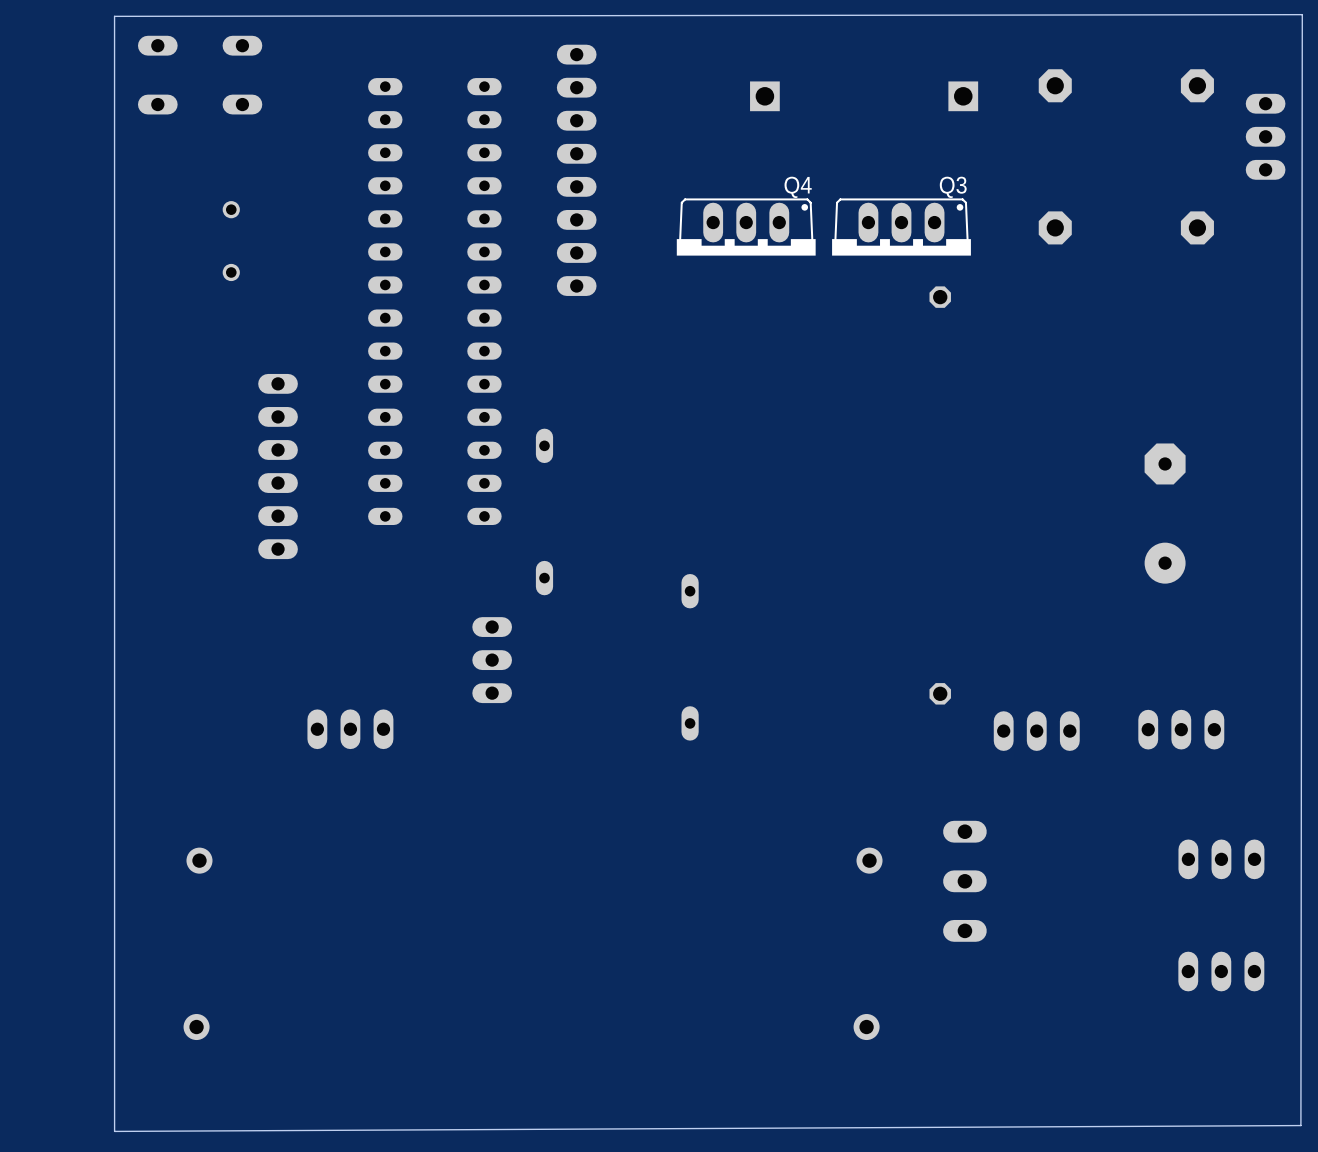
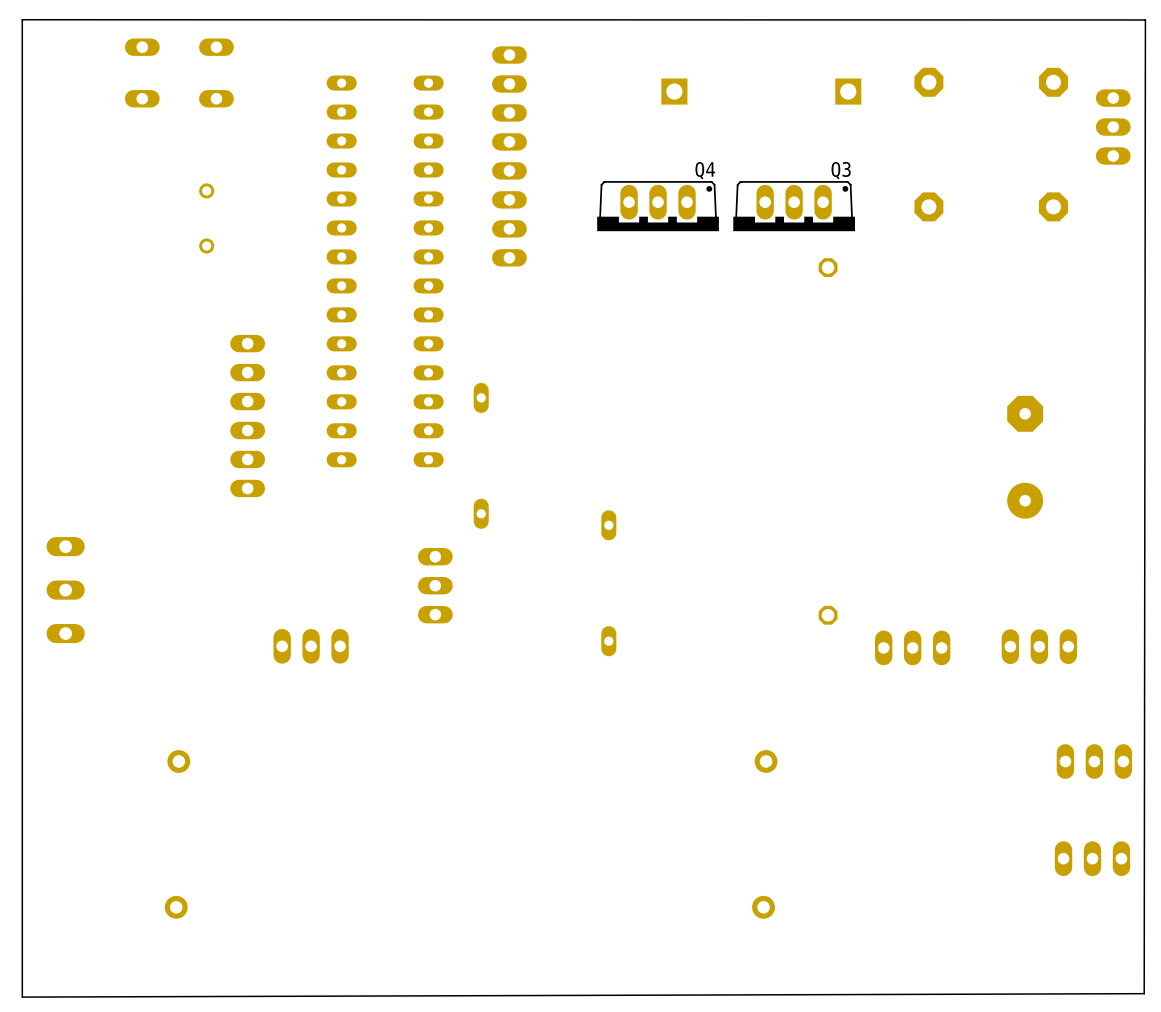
board edge: (1302, 14) (114, 16) (114, 1131) (1300, 1125) -> (1145, 19) (22, 19) (22, 997) (1144, 993)
part: none -> (65, 590)
part position: (1221, 859) -> (1094, 761)
part: (964, 881) -> none
part position: (1221, 971) -> (1092, 858)

